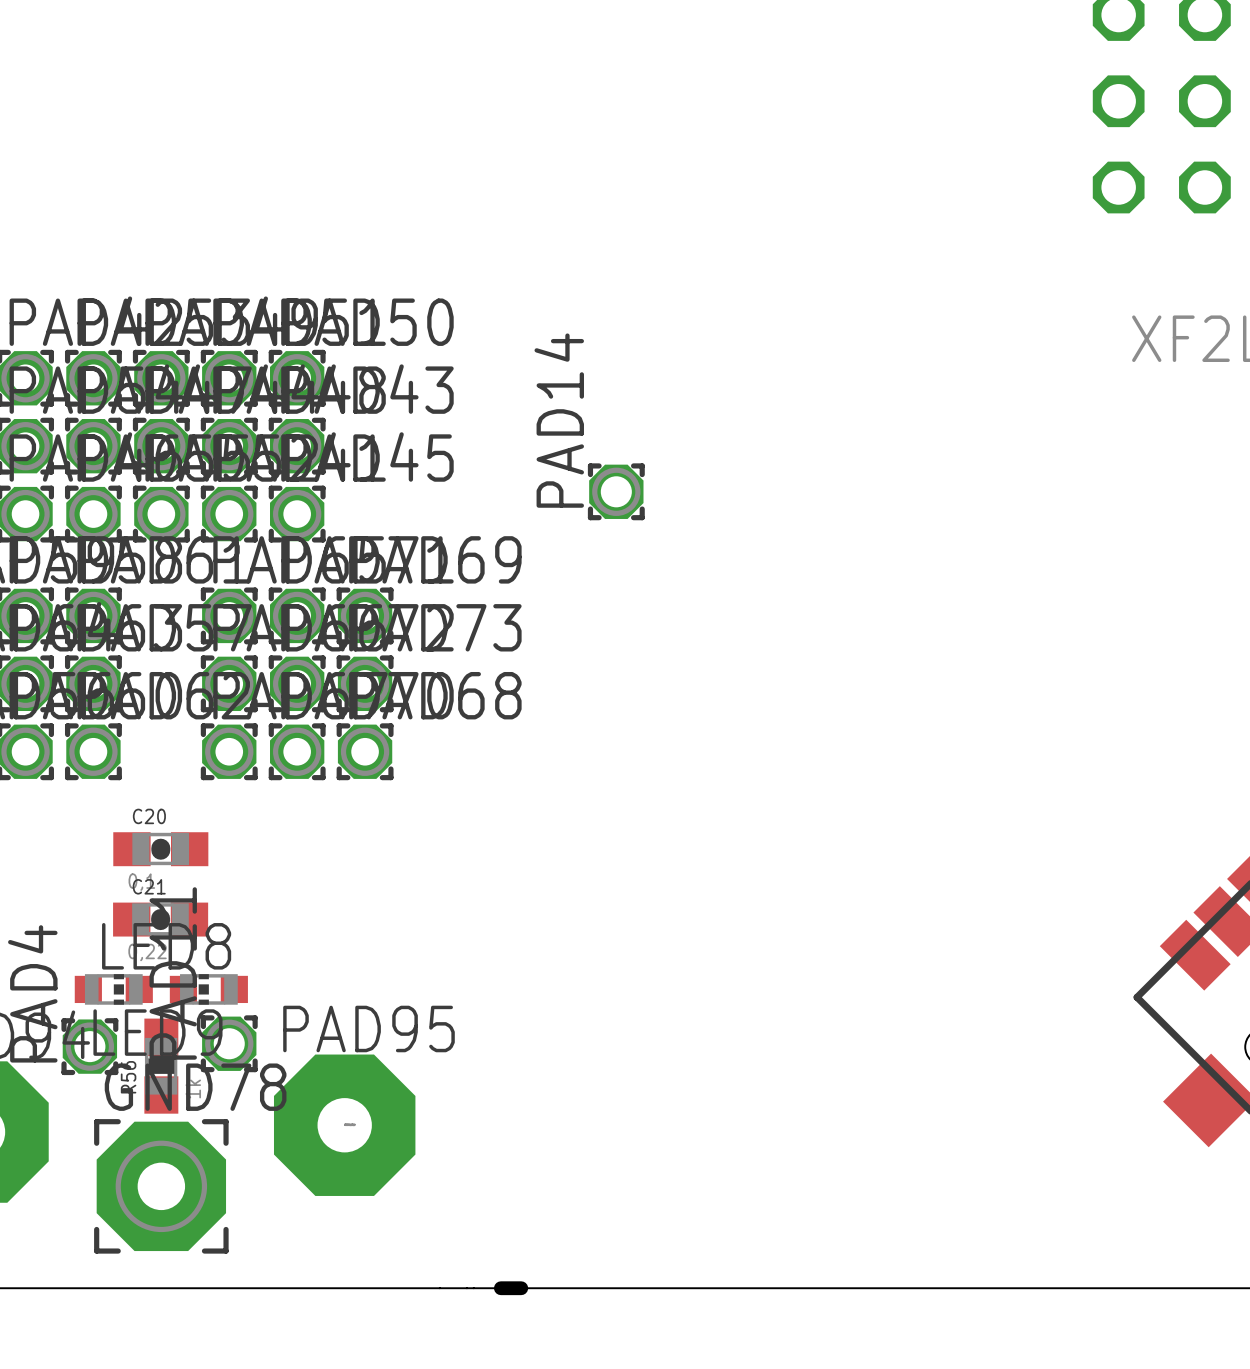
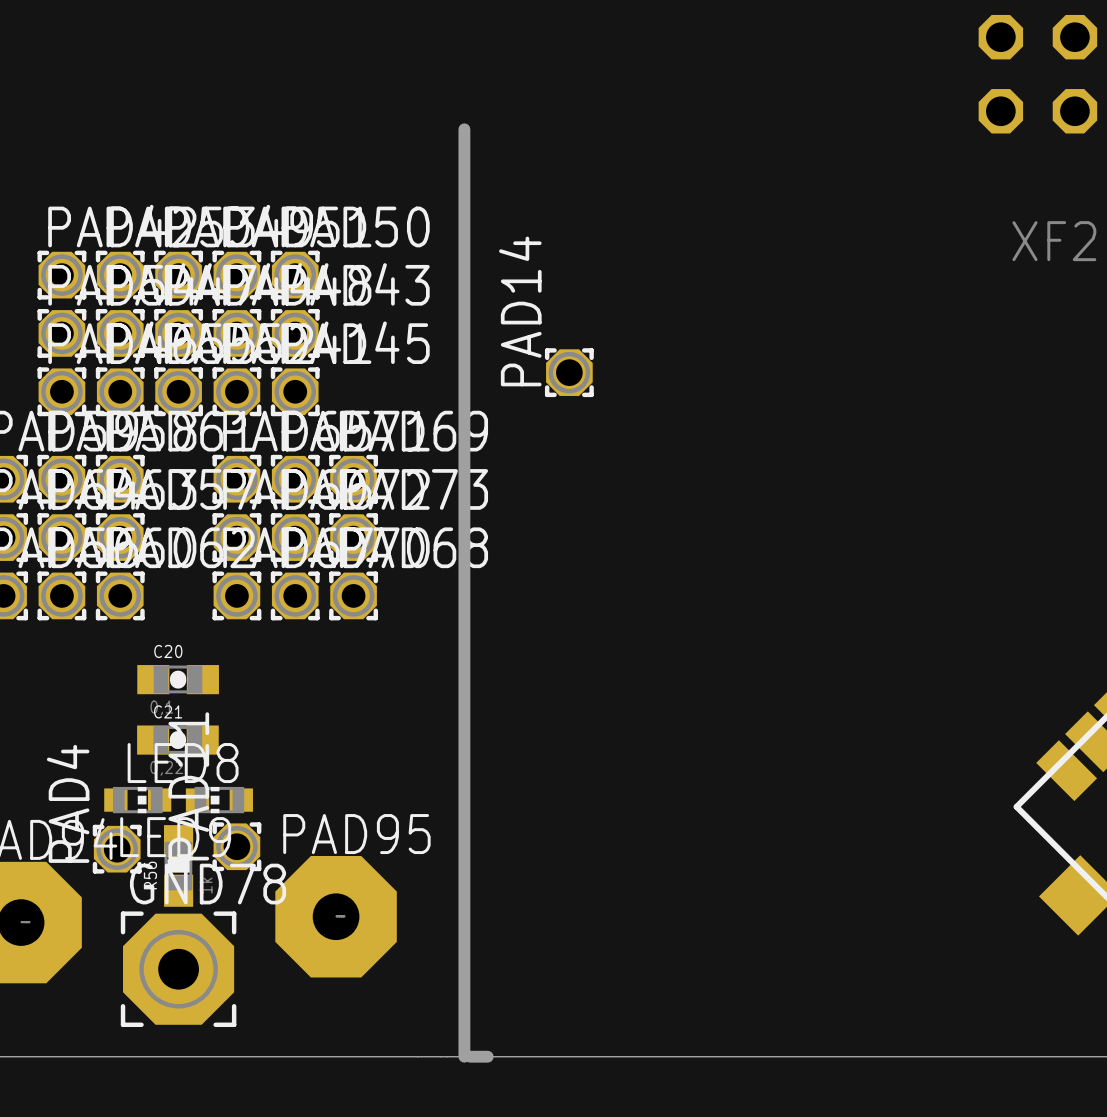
board edge: none -> (464, 129) (464, 1056)

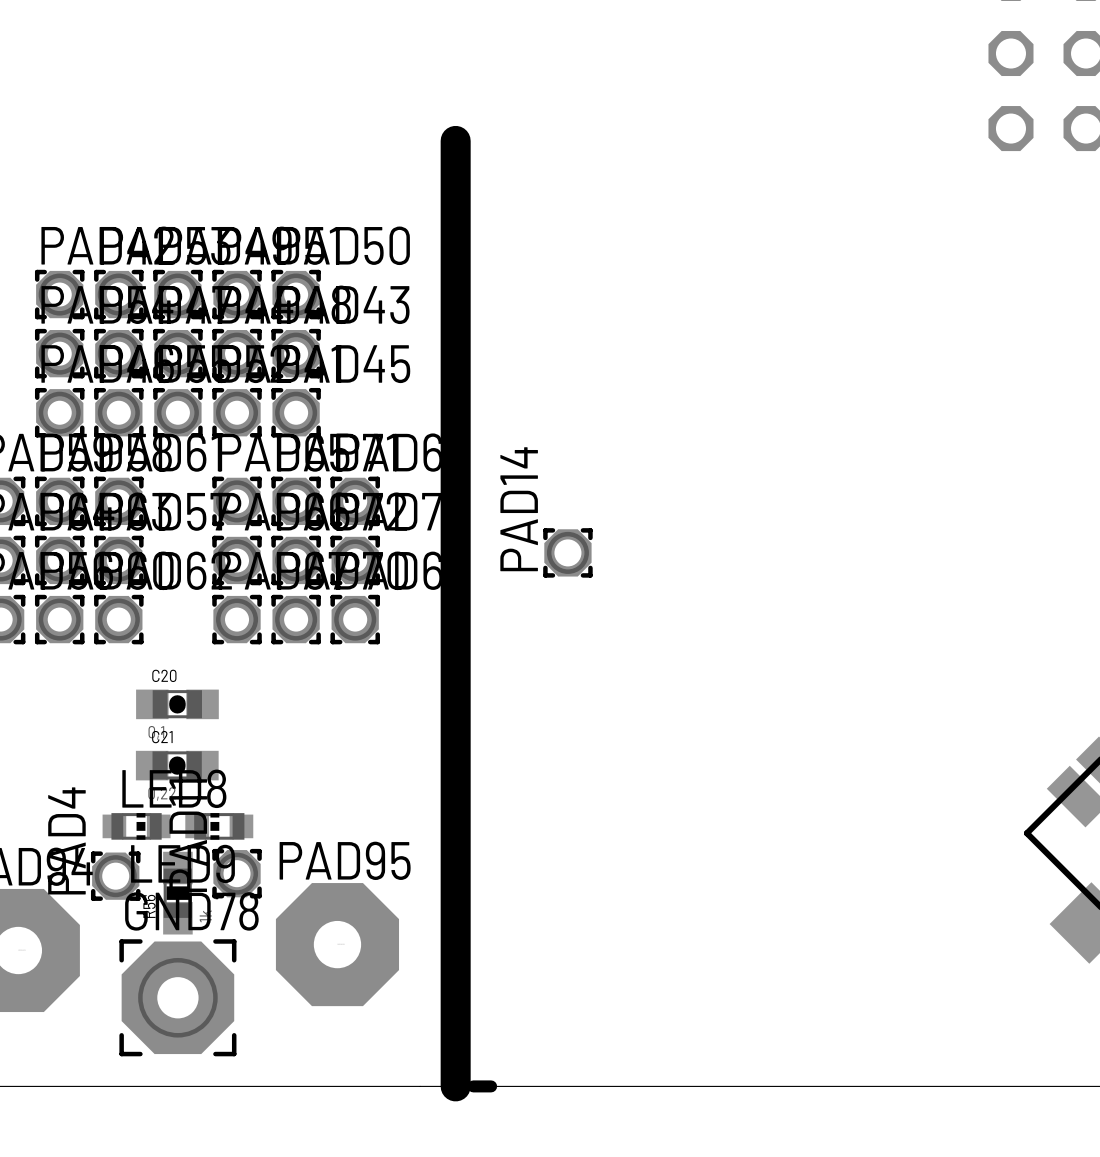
board edge: none -> (455, 140) (455, 1086)
board edge: (464, 129) (464, 1056) -> none
PAD14 position: (569, 372) -> (567, 552)

